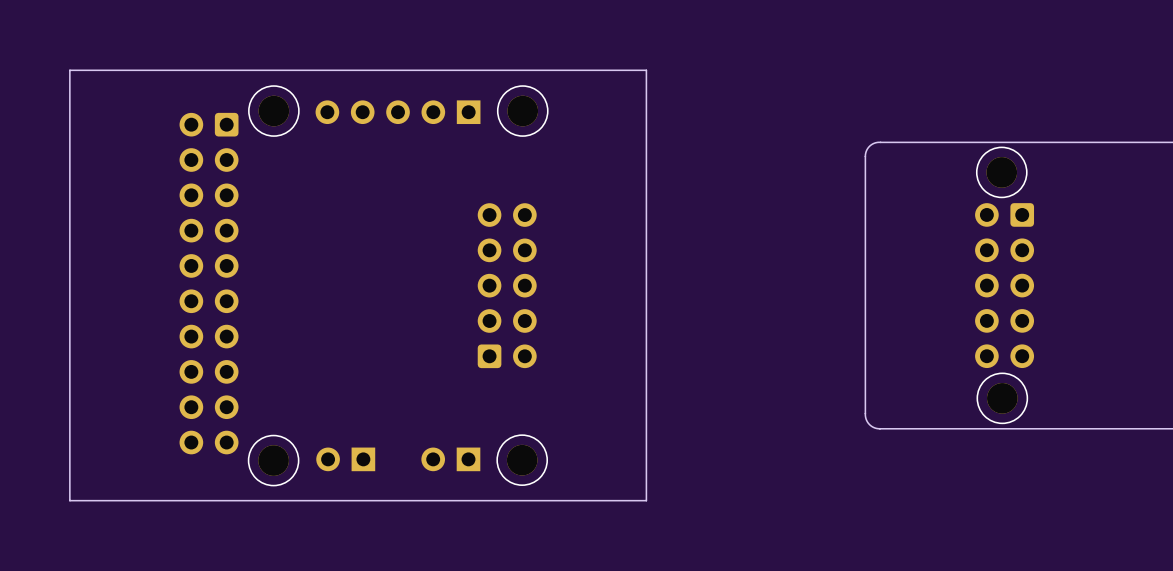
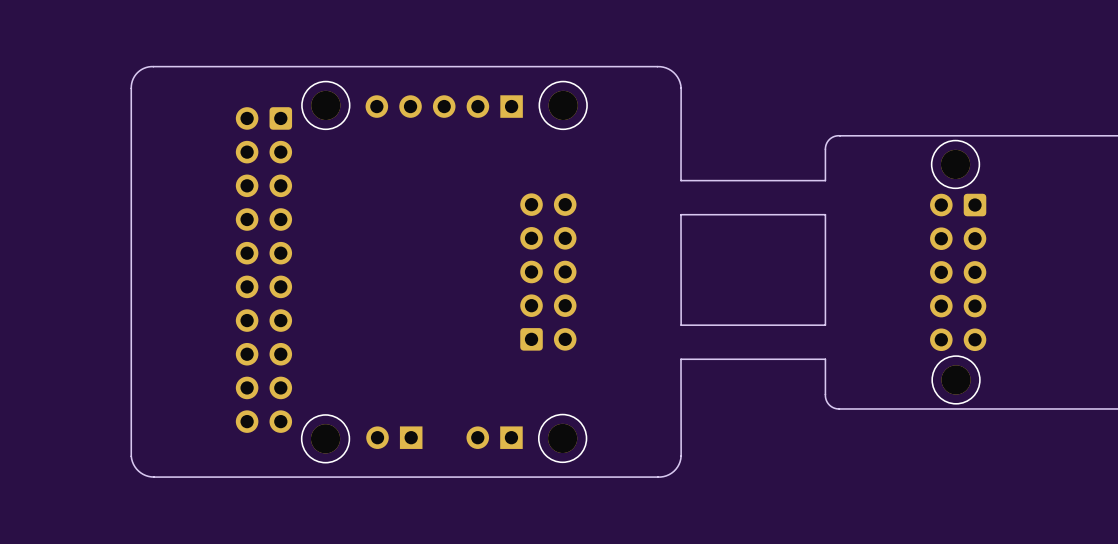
board edge: (646, 70) (69, 70) (69, 500) (646, 500) (646, 70) -> none
part position: (273, 111) -> (325, 105)
part position: (522, 111) -> (563, 105)
part position: (398, 112) -> (444, 106)
board edge: (865, 189) (865, 225) -> (825, 180) (681, 180) (680, 85) (673, 72) (663, 67) (153, 66) (143, 68) (134, 76) (131, 85) (131, 456) (133, 464) (138, 471) (145, 475) (153, 477) (660, 477) (673, 471) (680, 458) (681, 359) (825, 359)
part position: (209, 283) -> (263, 270)
part position: (507, 285) -> (548, 271)
board edge: (865, 340) (865, 376) -> (825, 325) (681, 325) (681, 214) (825, 214)
part footprint: [496, 434, 548, 486] -> [466, 426, 523, 449]
part footprint: [316, 447, 376, 472] -> [301, 414, 351, 464]
part position: (450, 459) -> (394, 437)
part: none -> (562, 438)
part: (273, 460) -> none

